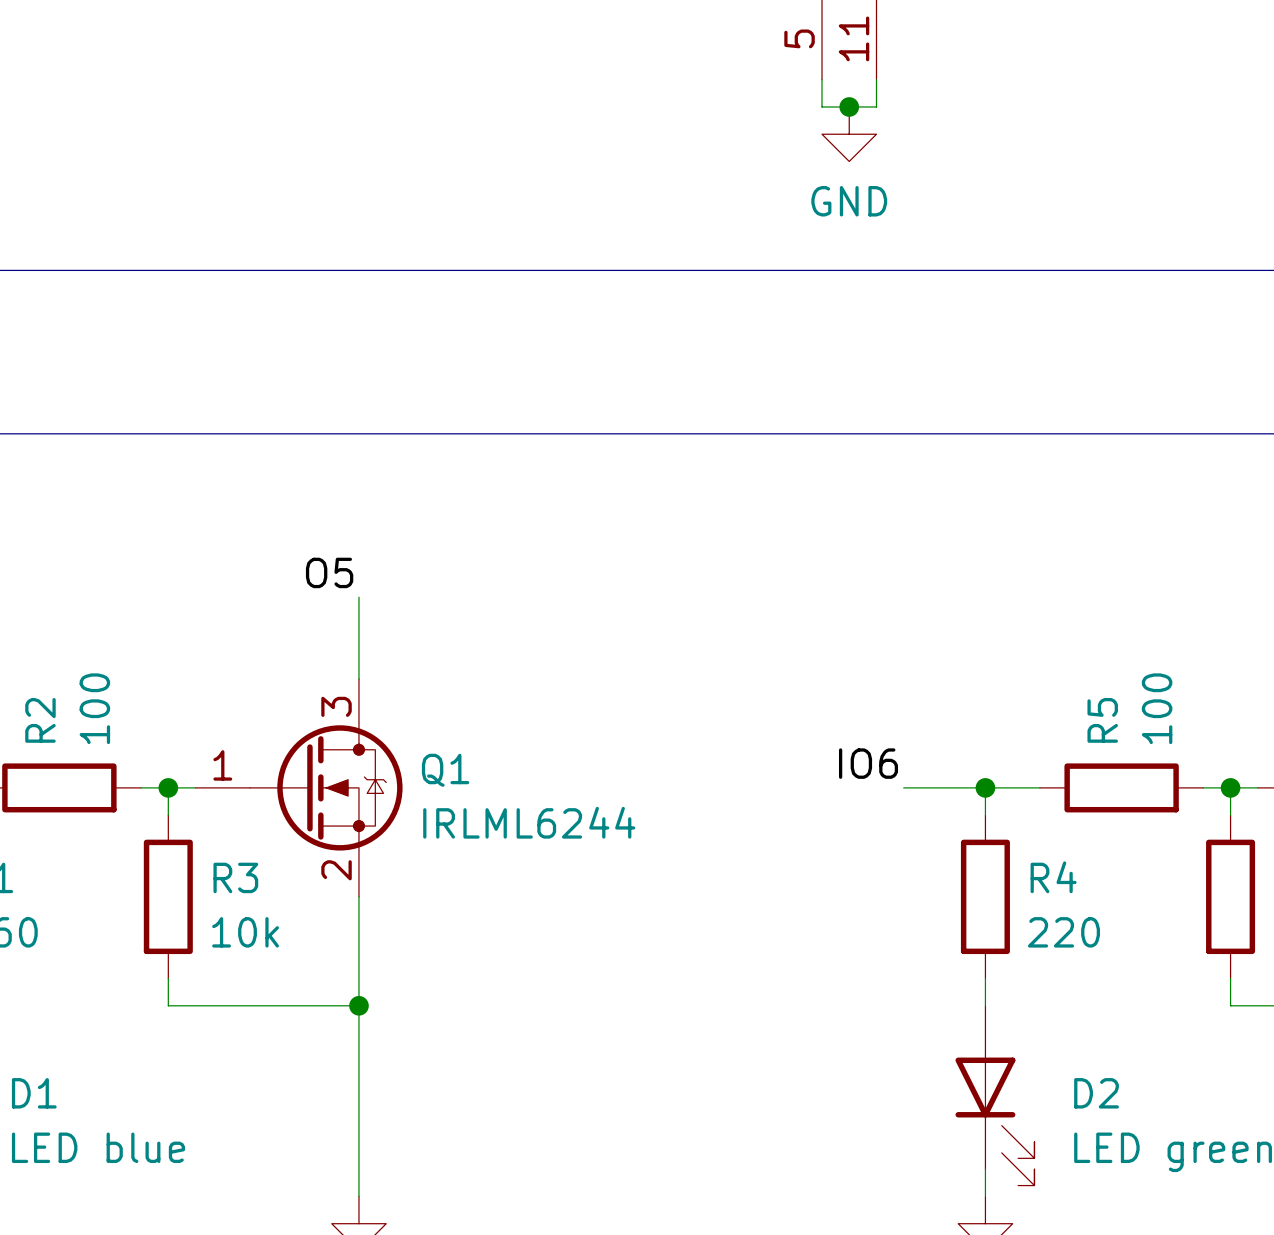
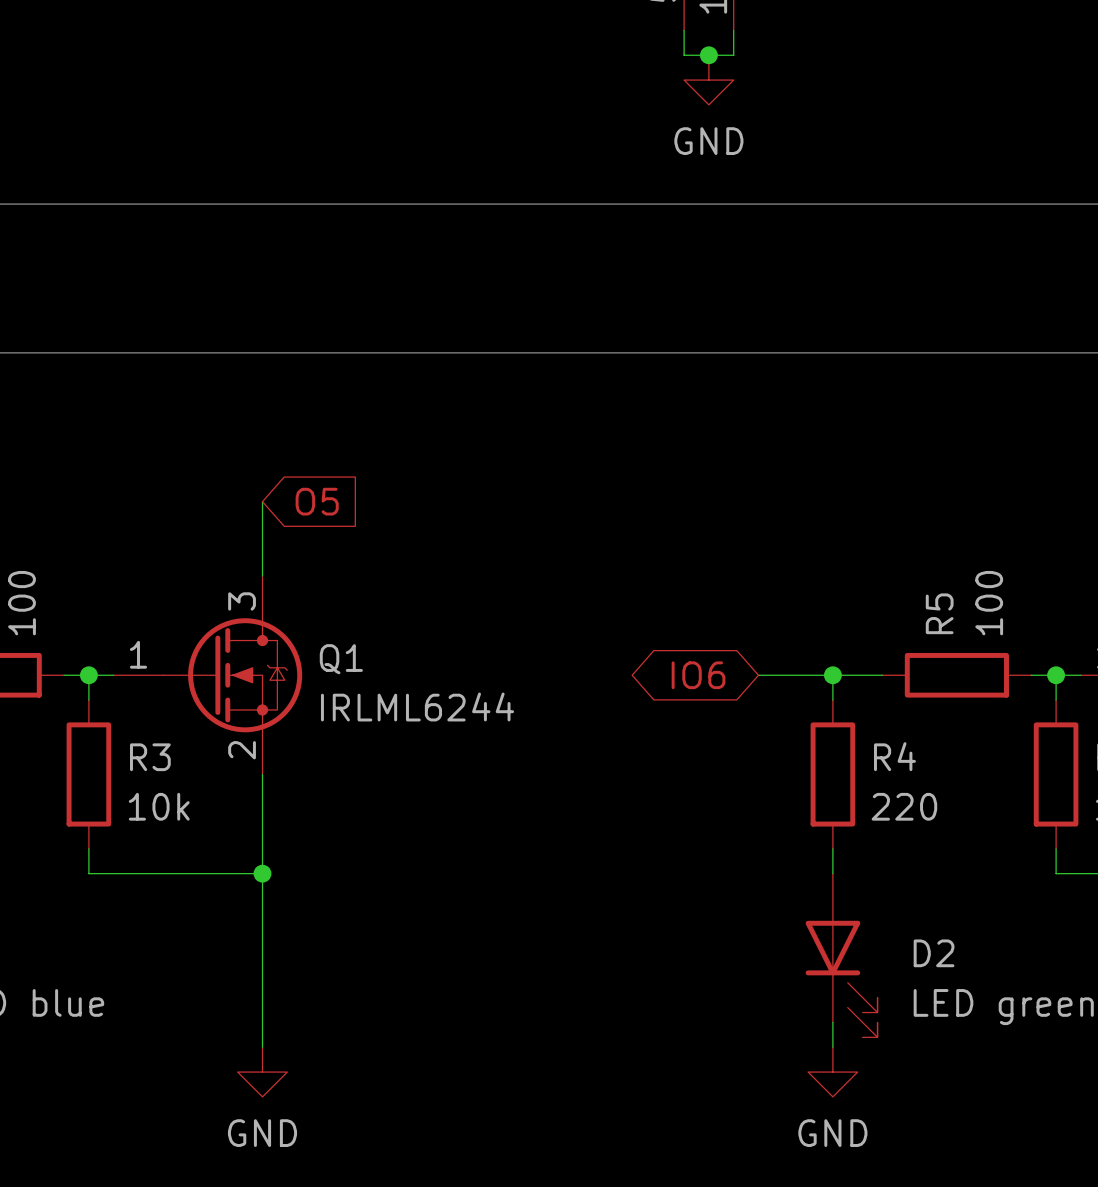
label: O5 (329, 572) -> none
global label: none -> O5 (317, 501)
label: IO6 (868, 763) -> none
global label: none -> IO6 (698, 675)

